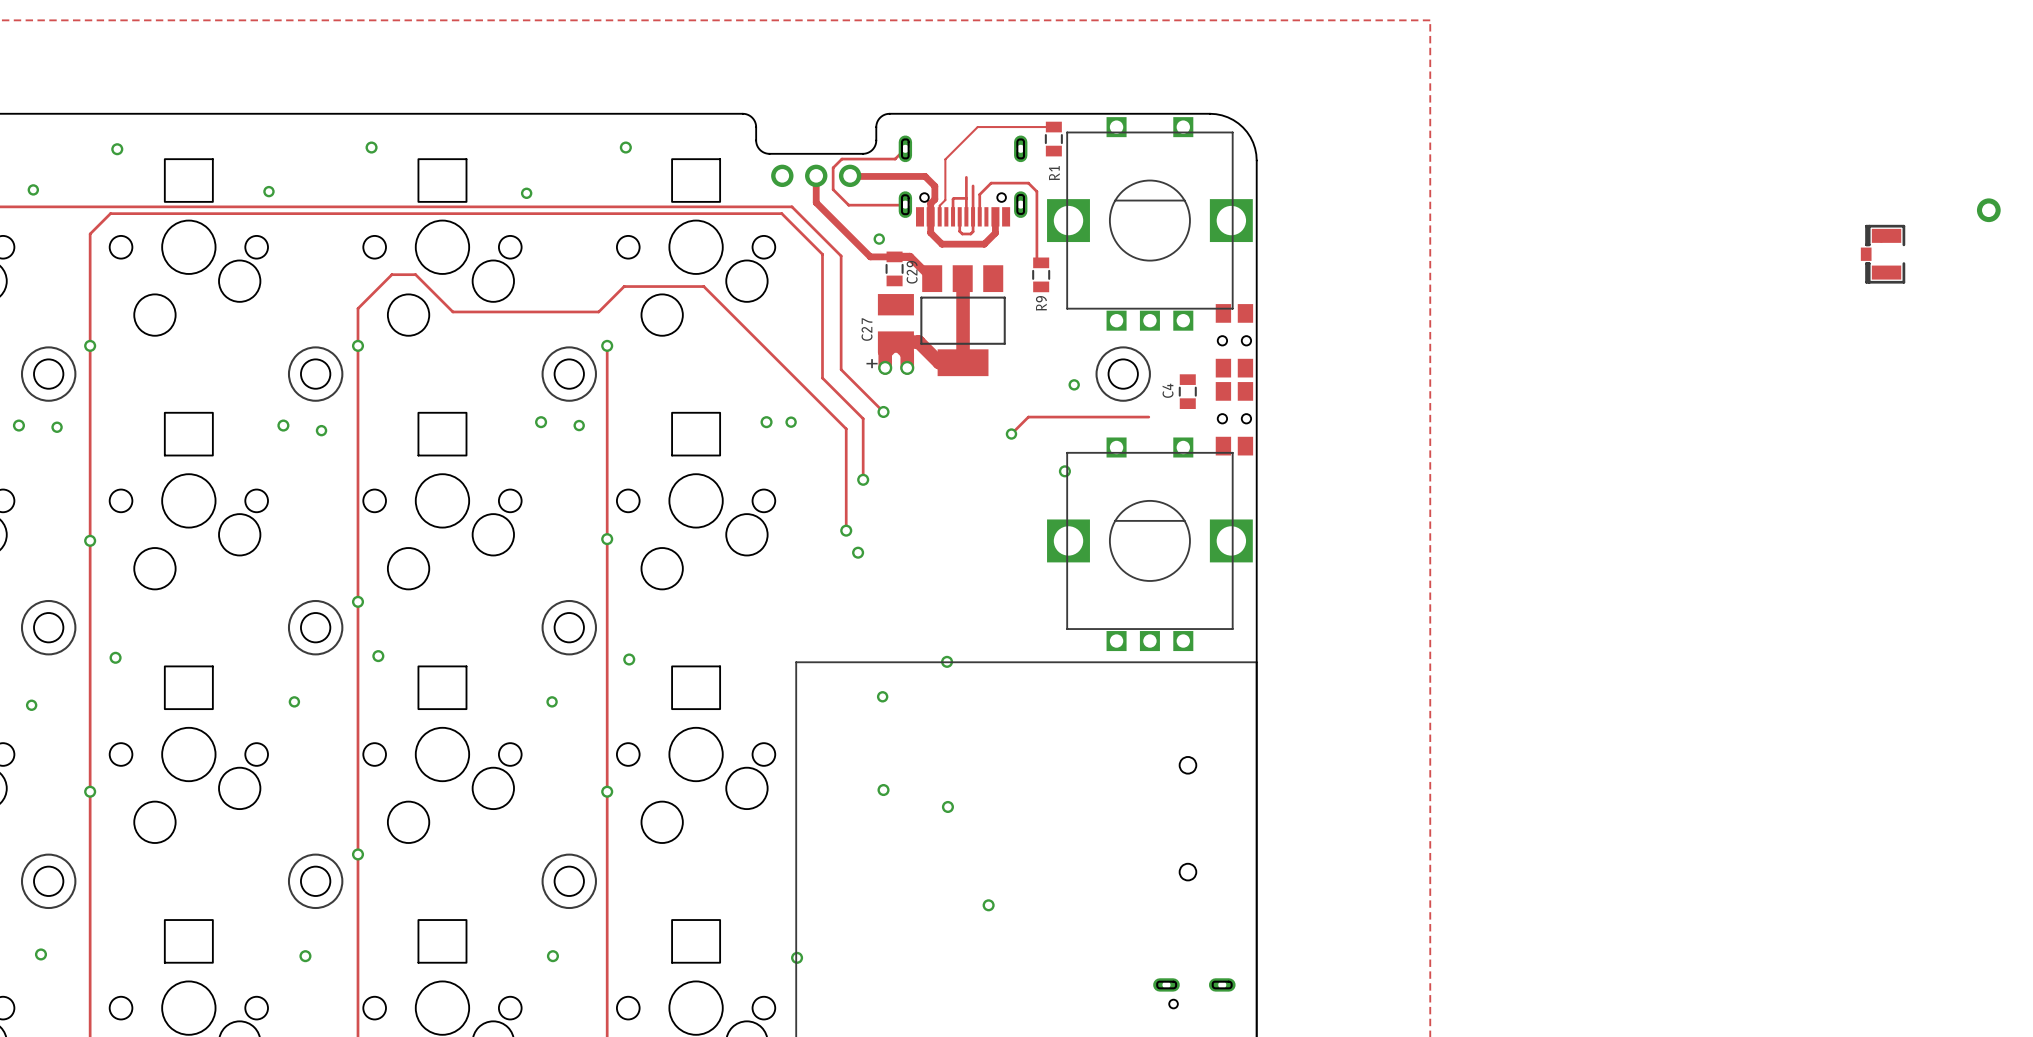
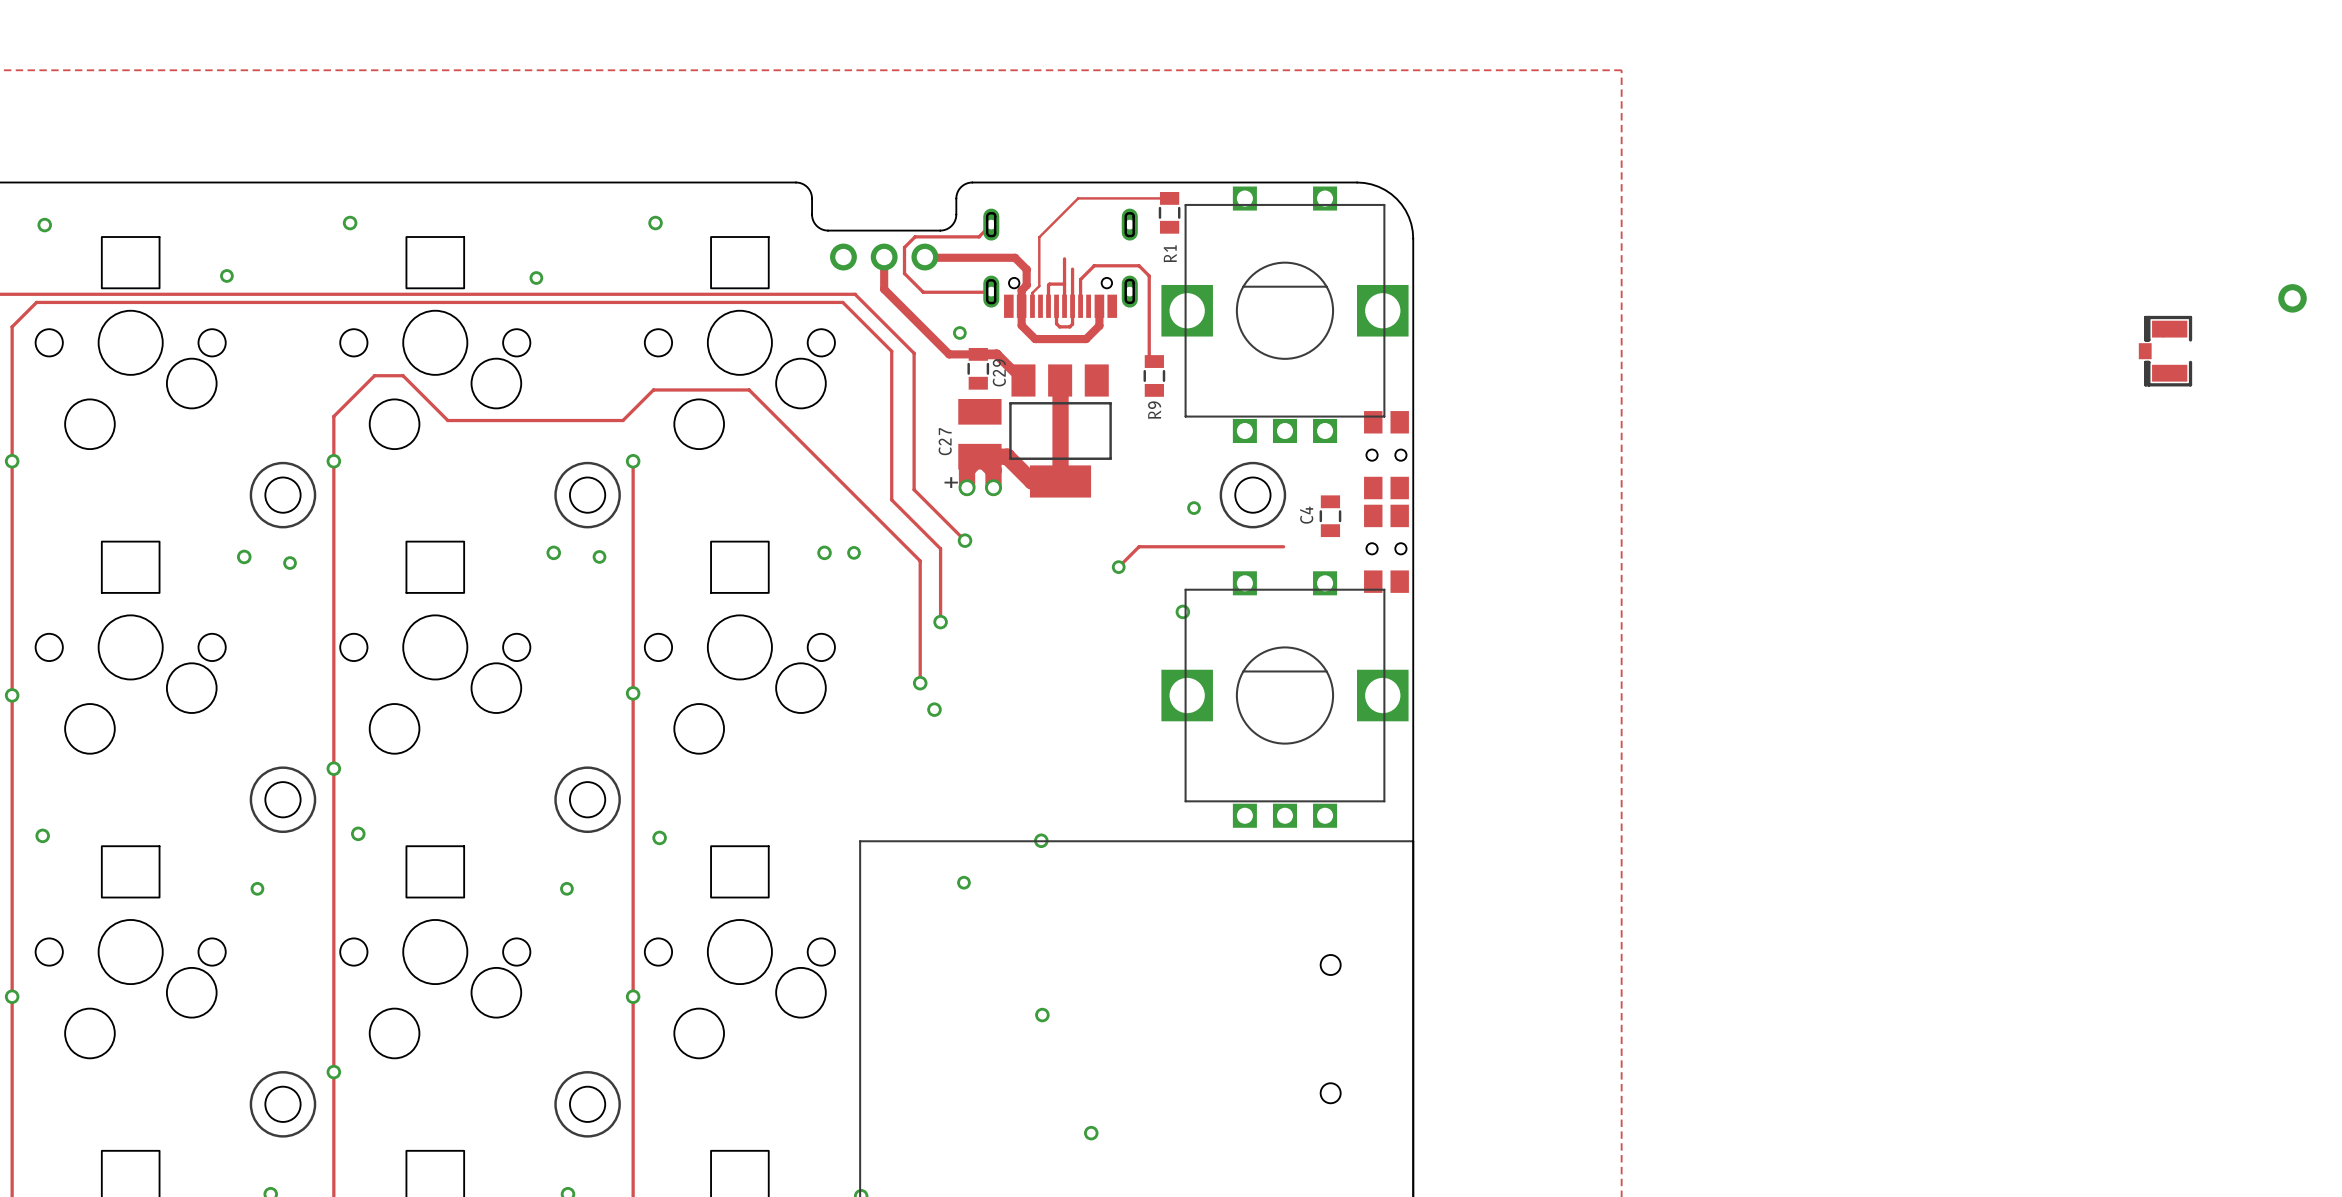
via: (883, 790) -> none

